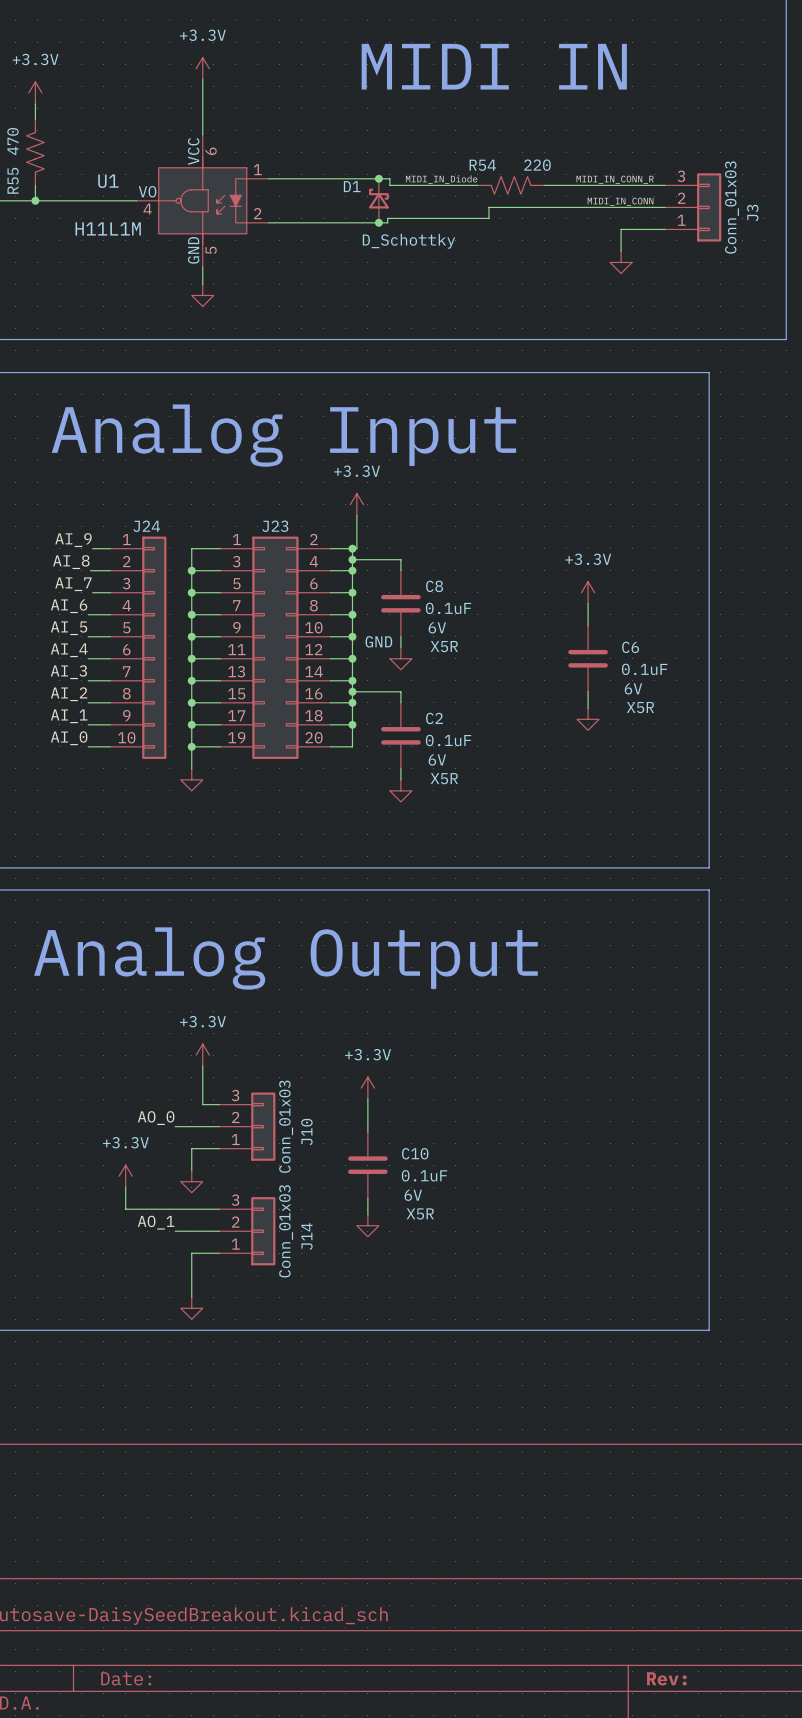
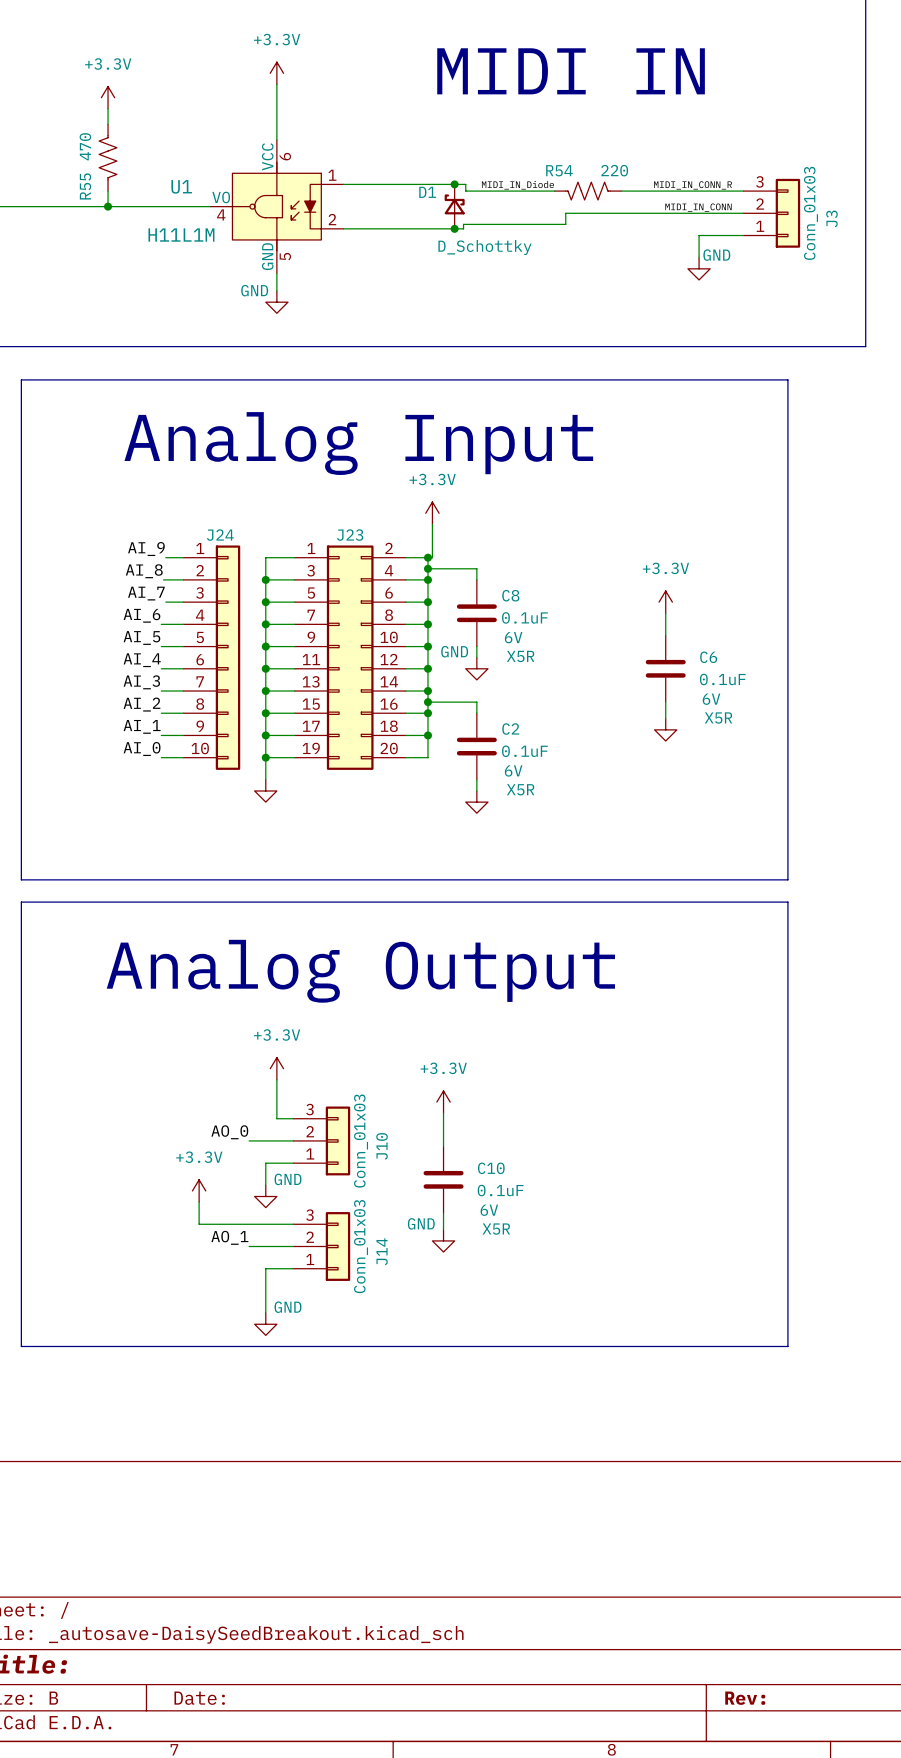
power symbol text: none -> GND (716, 255)
power symbol text: none -> GND (254, 290)
power symbol text: none -> GND (287, 1179)
power symbol text: none -> GND (421, 1223)
power symbol text: none -> GND (287, 1307)

